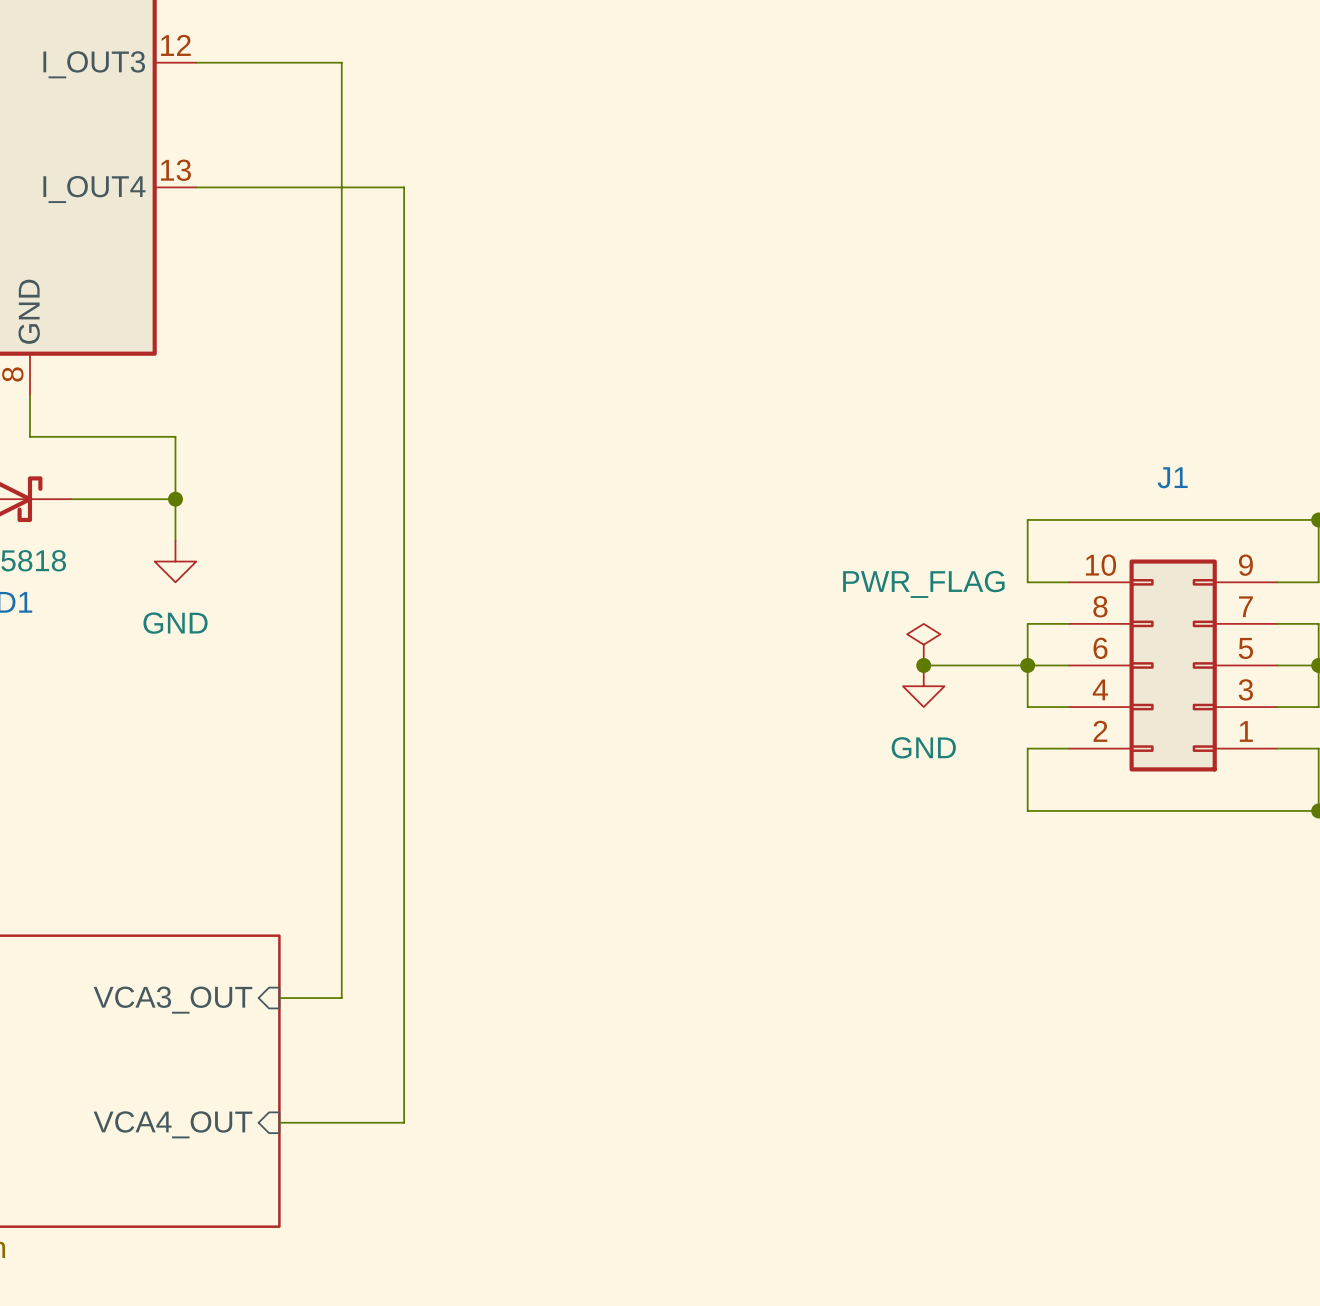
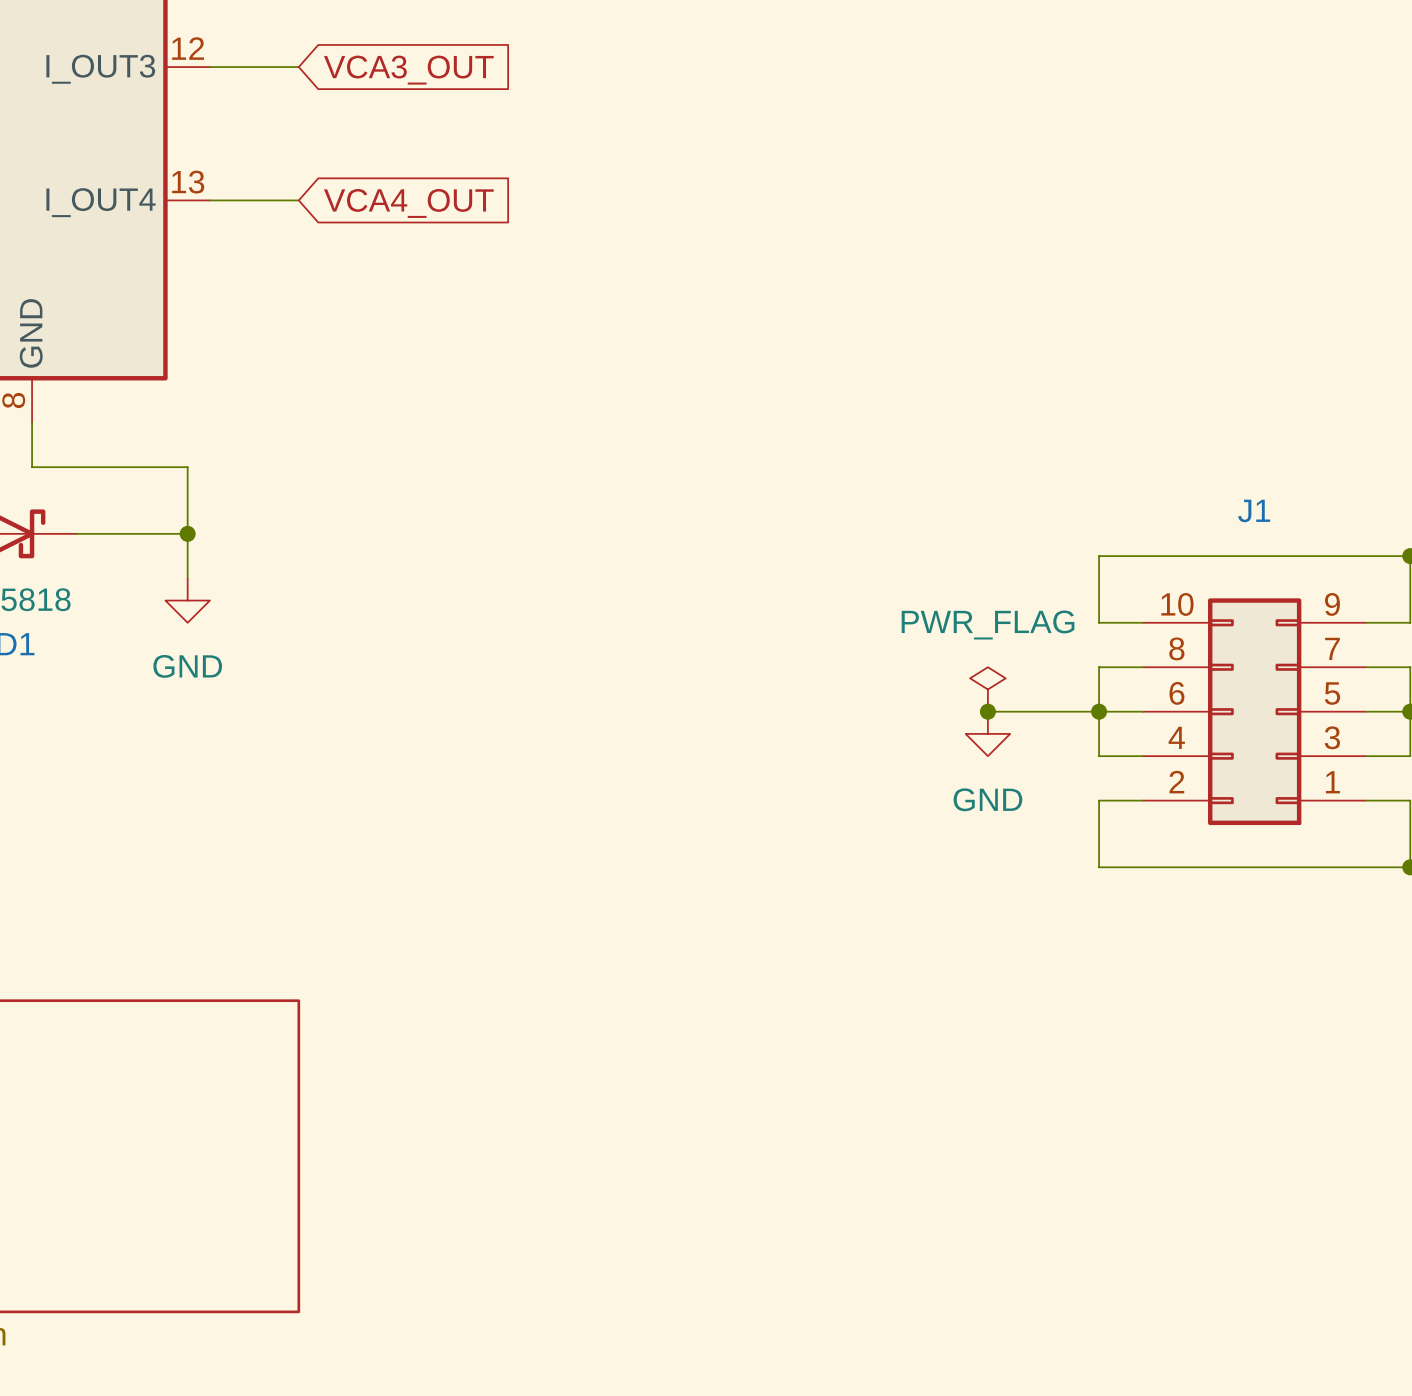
wire: (279, 62) (341, 62) (341, 998) (279, 998) -> none
global label: none -> VCA3_OUT (408, 70)
wire: (279, 187) (404, 187) (404, 1122) (279, 1122) -> none
global label: none -> VCA4_OUT (408, 203)
sheet pin: VCA3_OUT (172, 1000) -> none
sheet pin: VCA4_OUT (172, 1124) -> none

